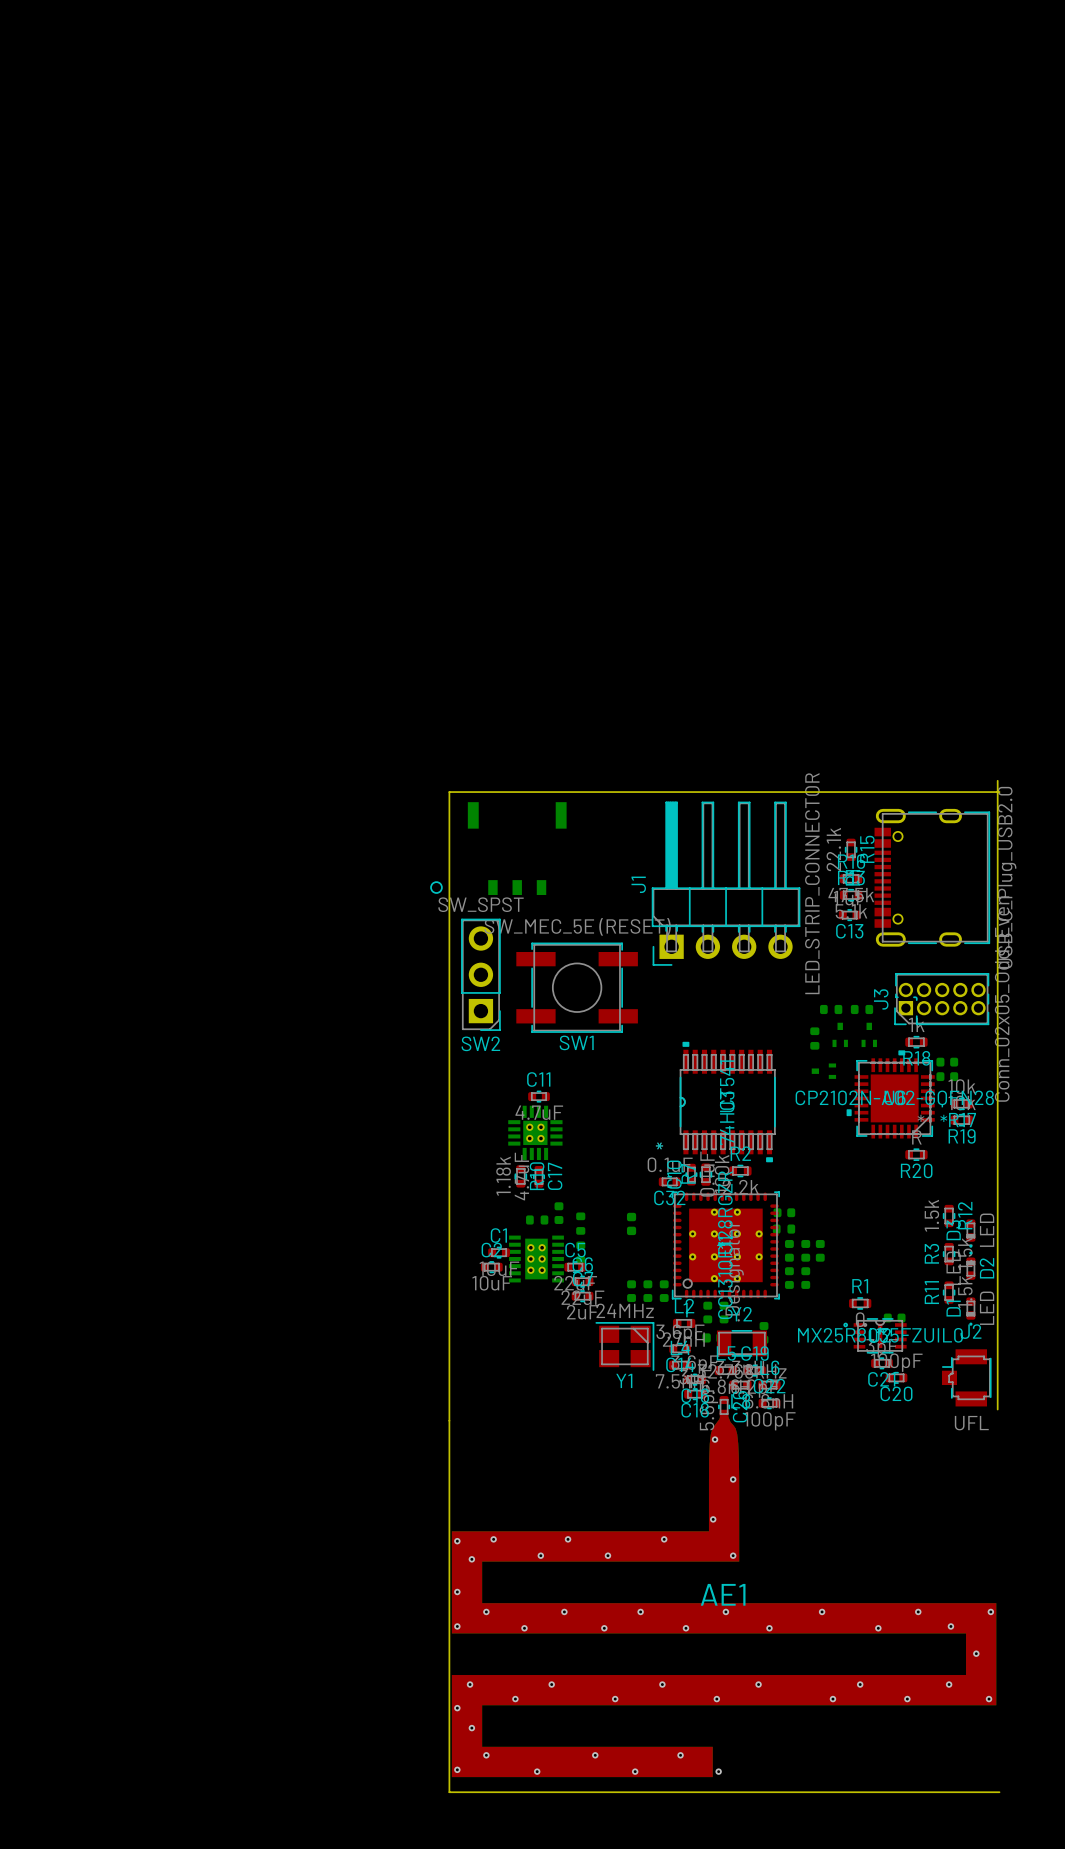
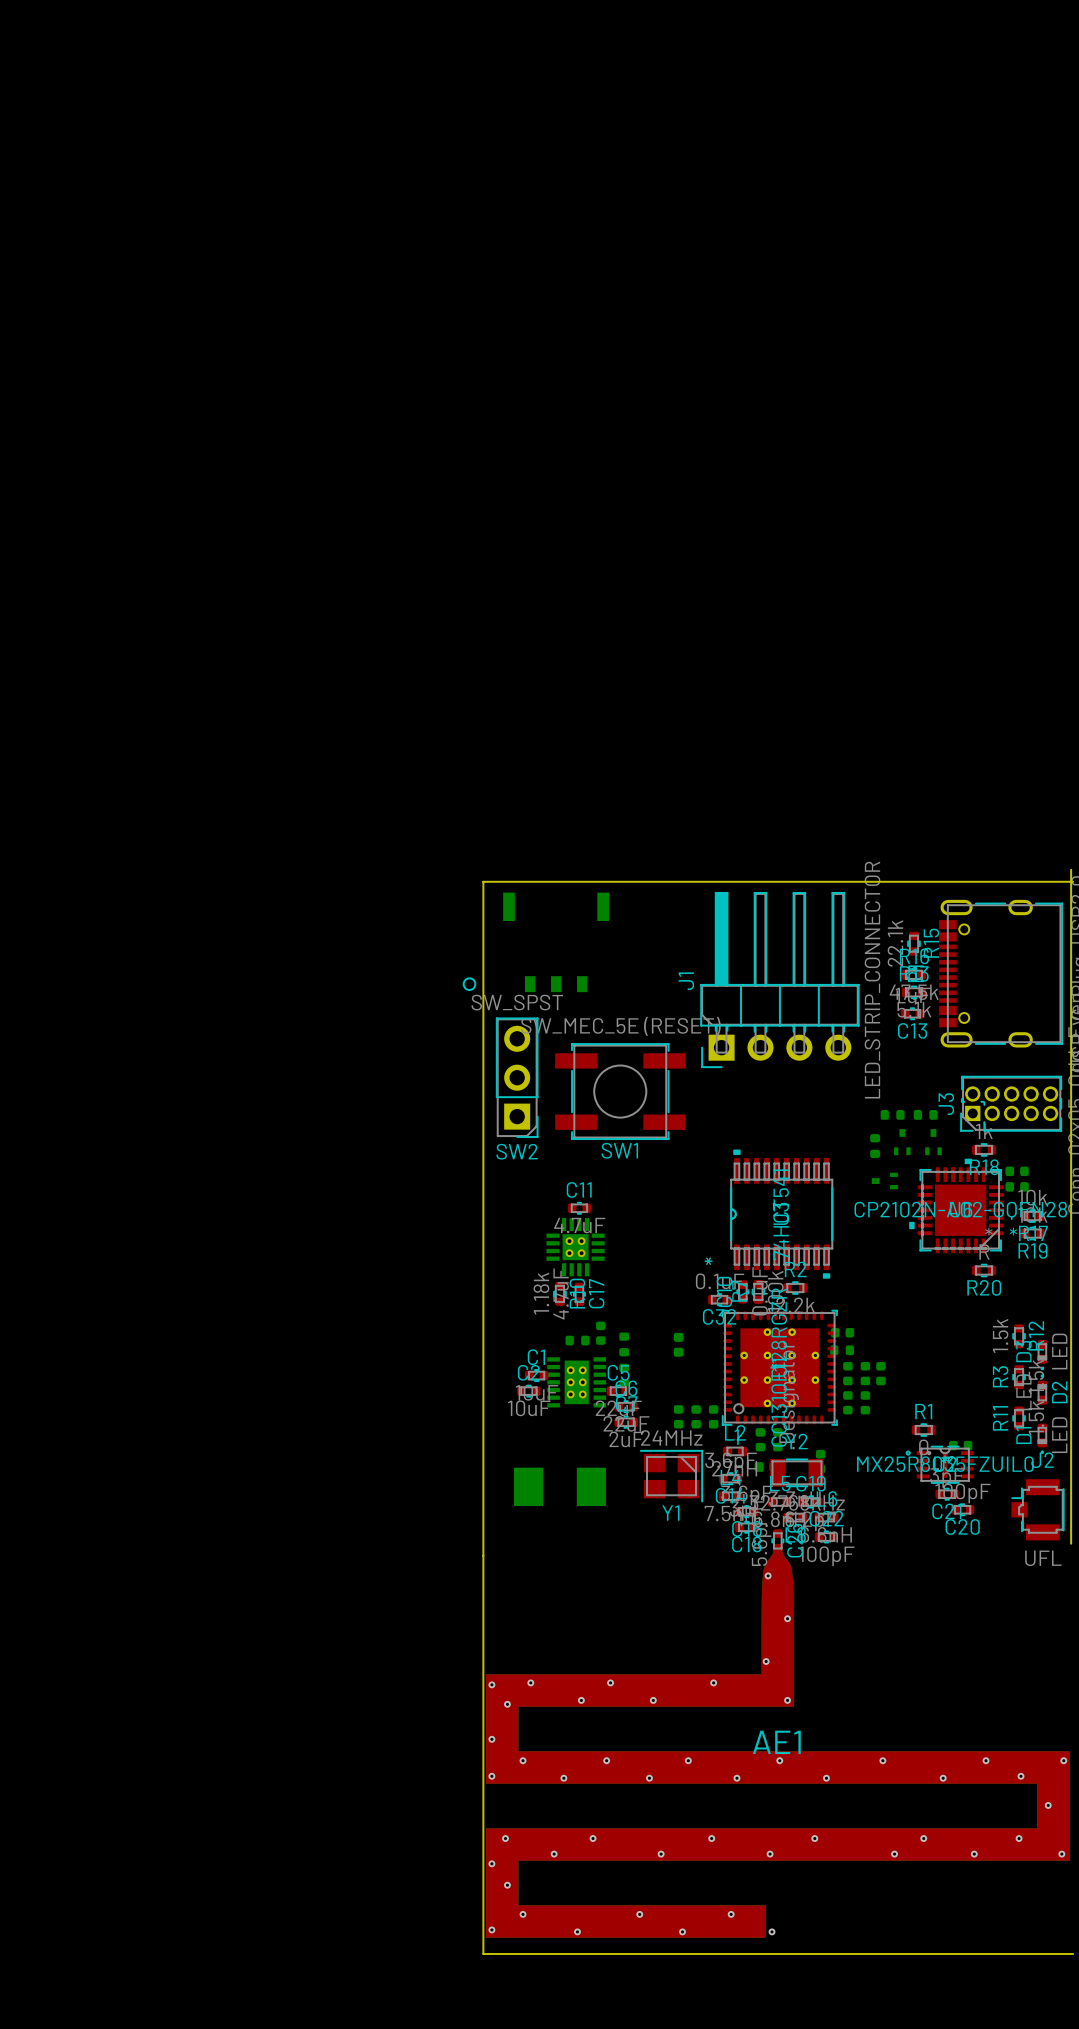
part: none -> (559, 1486)

